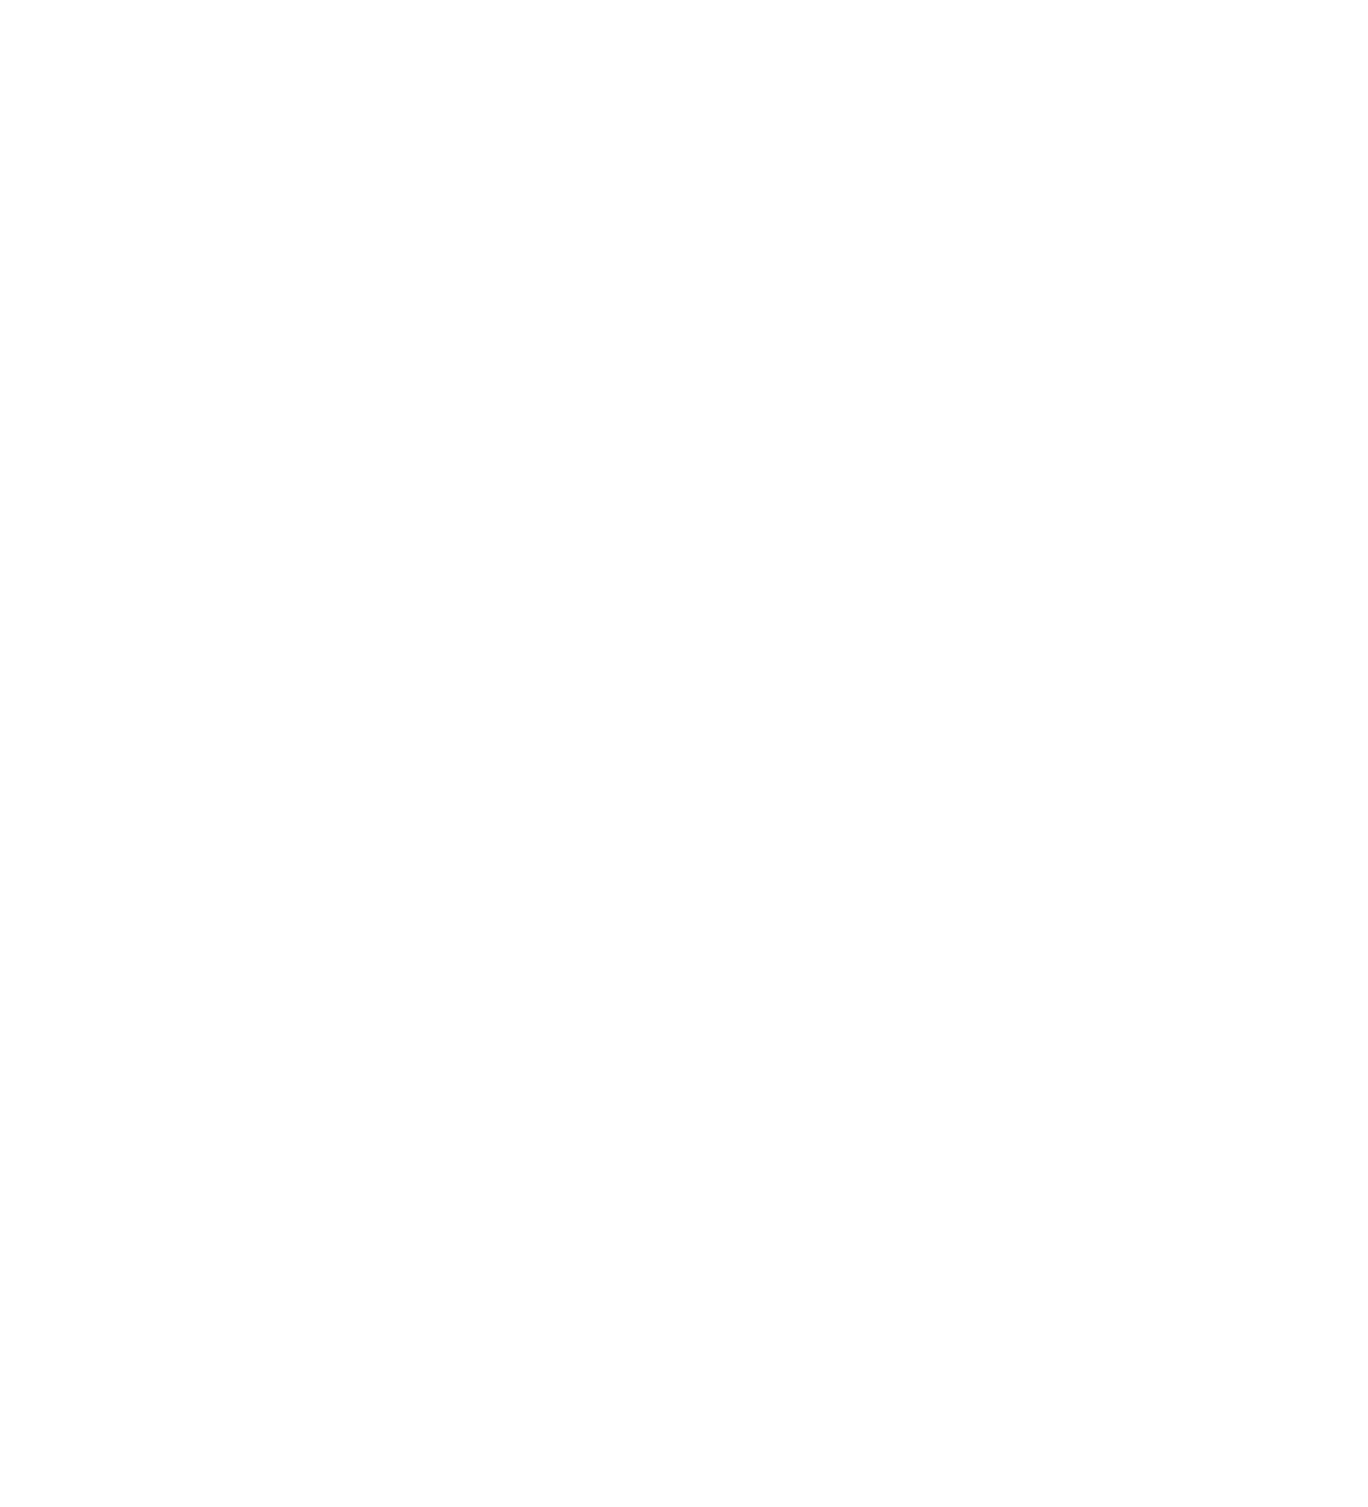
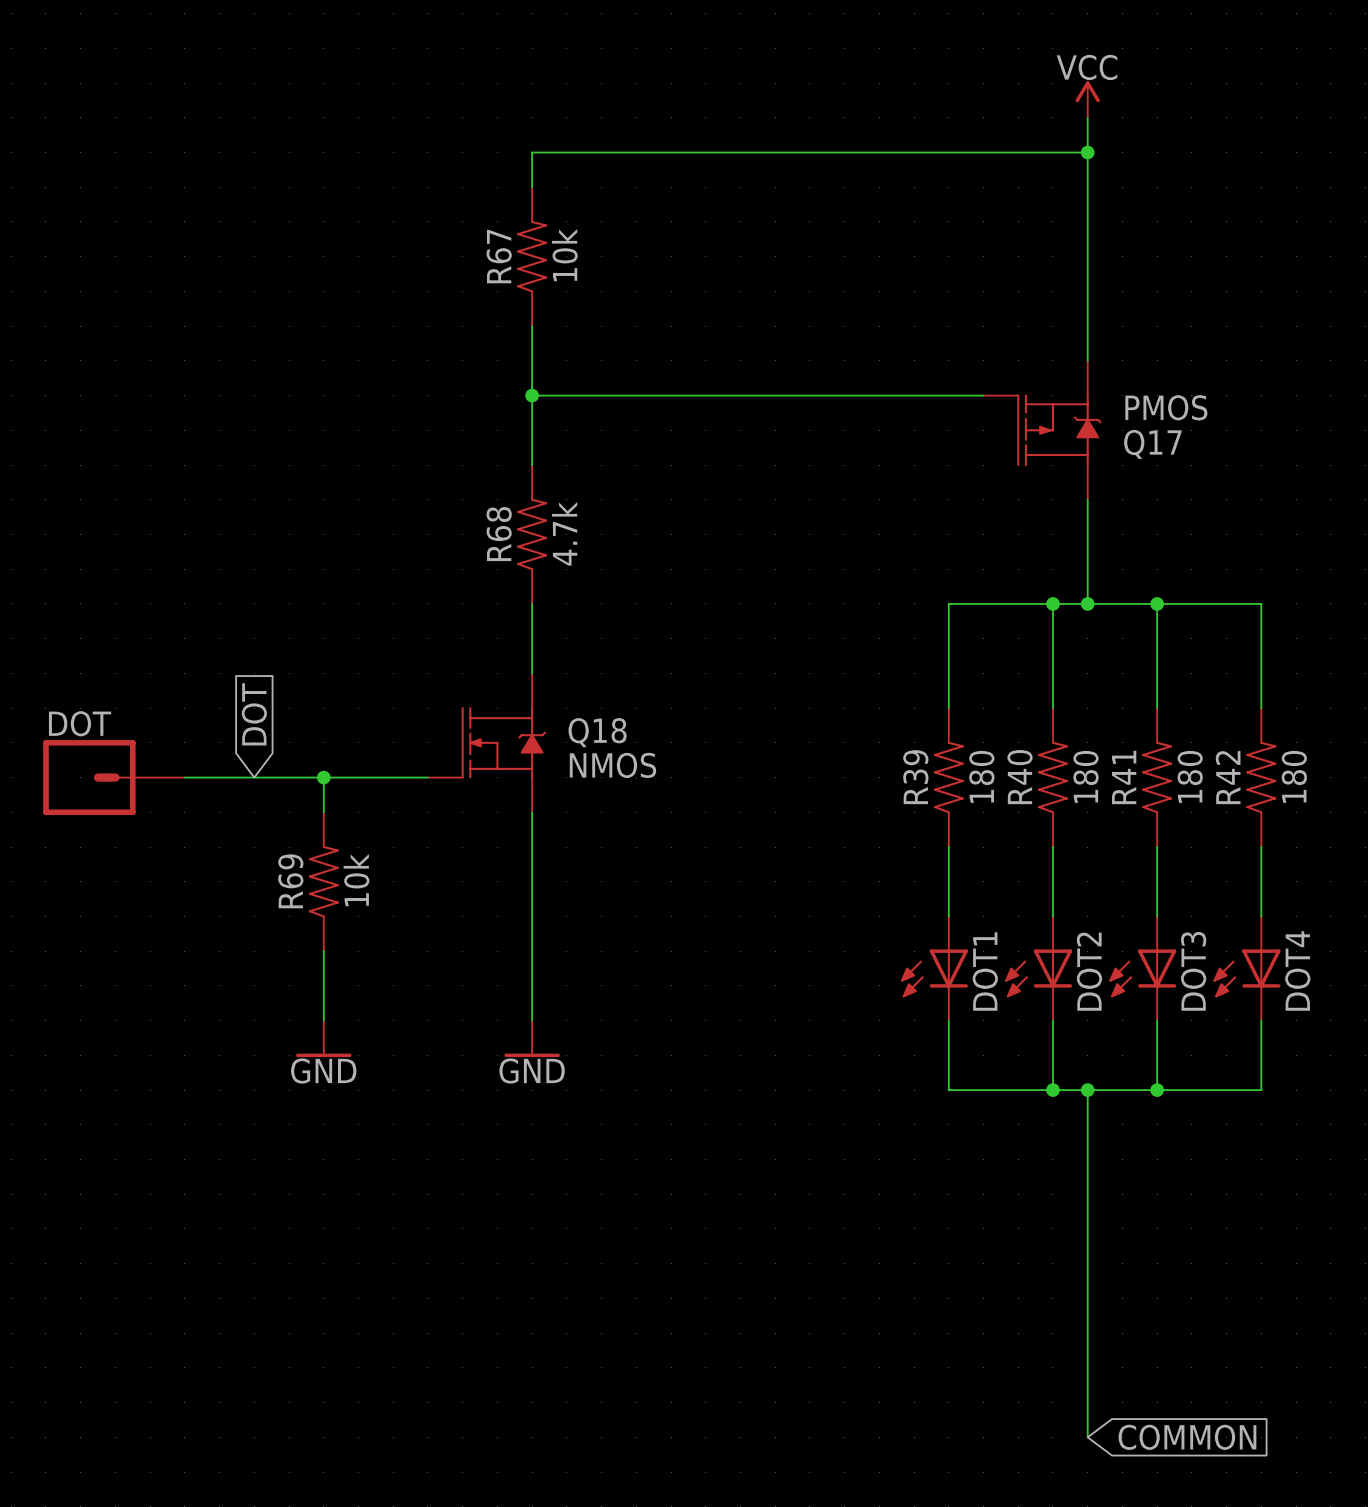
power symbol: none -> VCC (1087, 99)
wire: none -> (1087, 117) (1087, 360)
wire: none -> (1087, 152) (532, 152) (532, 187)
junction: none -> (1087, 152)
R67: none -> 10k (532, 256)
wire: none -> (532, 326) (532, 465)
wire: none -> (532, 395) (983, 395)
junction: none -> (532, 395)
Q17: none -> PMOS (1042, 430)
wire: none -> (1087, 499) (1087, 603)
R68: none -> 4.7k (532, 534)
wire: none -> (532, 603) (532, 673)
wire: none -> (1052, 603) (1052, 708)
junction: none -> (1052, 603)
junction: none -> (1087, 603)
wire: none -> (1157, 603) (1157, 708)
junction: none -> (1157, 603)
wire: none -> (948, 708) (948, 603) (1261, 603) (1261, 708)
global label: none -> DOT (254, 714)
Q18: none -> NMOS (486, 742)
DOT: none -> (114, 777)
wire: none -> (184, 777) (427, 777)
wire: none -> (323, 777) (323, 812)
junction: none -> (323, 777)
R39: none -> 180 (948, 777)
R40: none -> 180 (1052, 777)
R41: none -> 180 (1157, 777)
R42: none -> 180 (1261, 777)
wire: none -> (532, 812) (532, 1020)
wire: none -> (948, 847) (948, 916)
wire: none -> (1052, 847) (1052, 916)
wire: none -> (1157, 847) (1157, 916)
wire: none -> (1261, 847) (1261, 916)
R69: none -> 10k (323, 881)
wire: none -> (323, 951) (323, 1020)
DOT1: none -> (934, 968)
DOT2: none -> (1038, 968)
DOT3: none -> (1142, 968)
DOT4: none -> (1246, 968)
wire: none -> (948, 1020) (948, 1090) (1261, 1090) (1261, 1020)
wire: none -> (1052, 1020) (1052, 1090)
wire: none -> (1157, 1020) (1157, 1090)
power symbol: none -> GND (323, 1038)
power symbol: none -> GND (532, 1038)
junction: none -> (1052, 1090)
wire: none -> (1087, 1090) (1087, 1437)
junction: none -> (1087, 1090)
junction: none -> (1157, 1090)
global label: none -> COMMON (1187, 1437)

